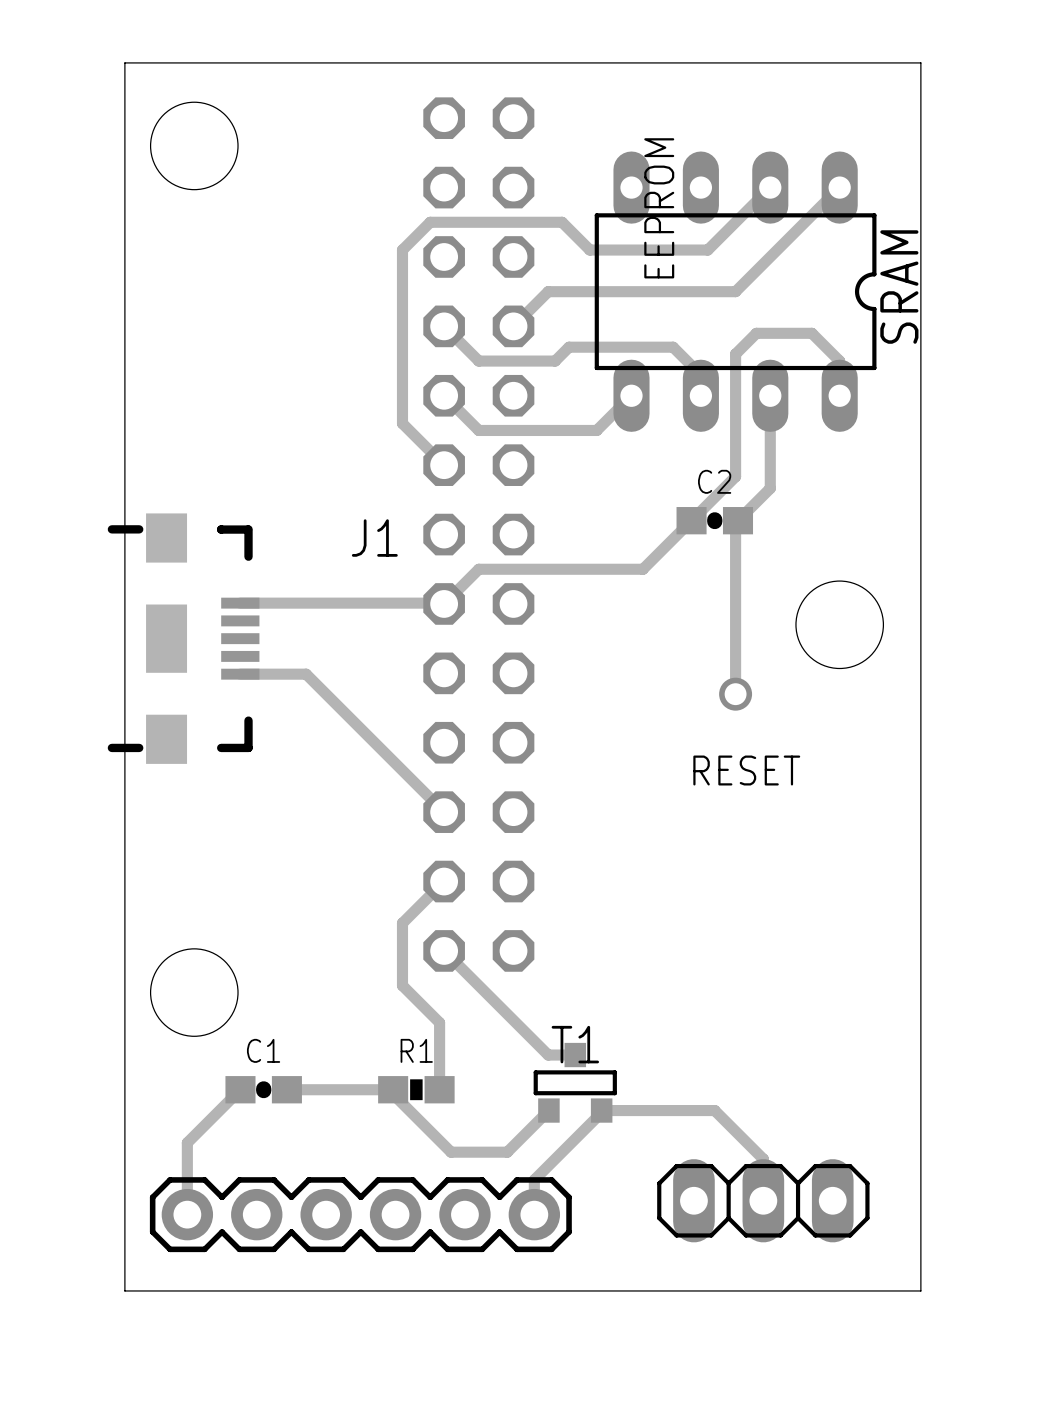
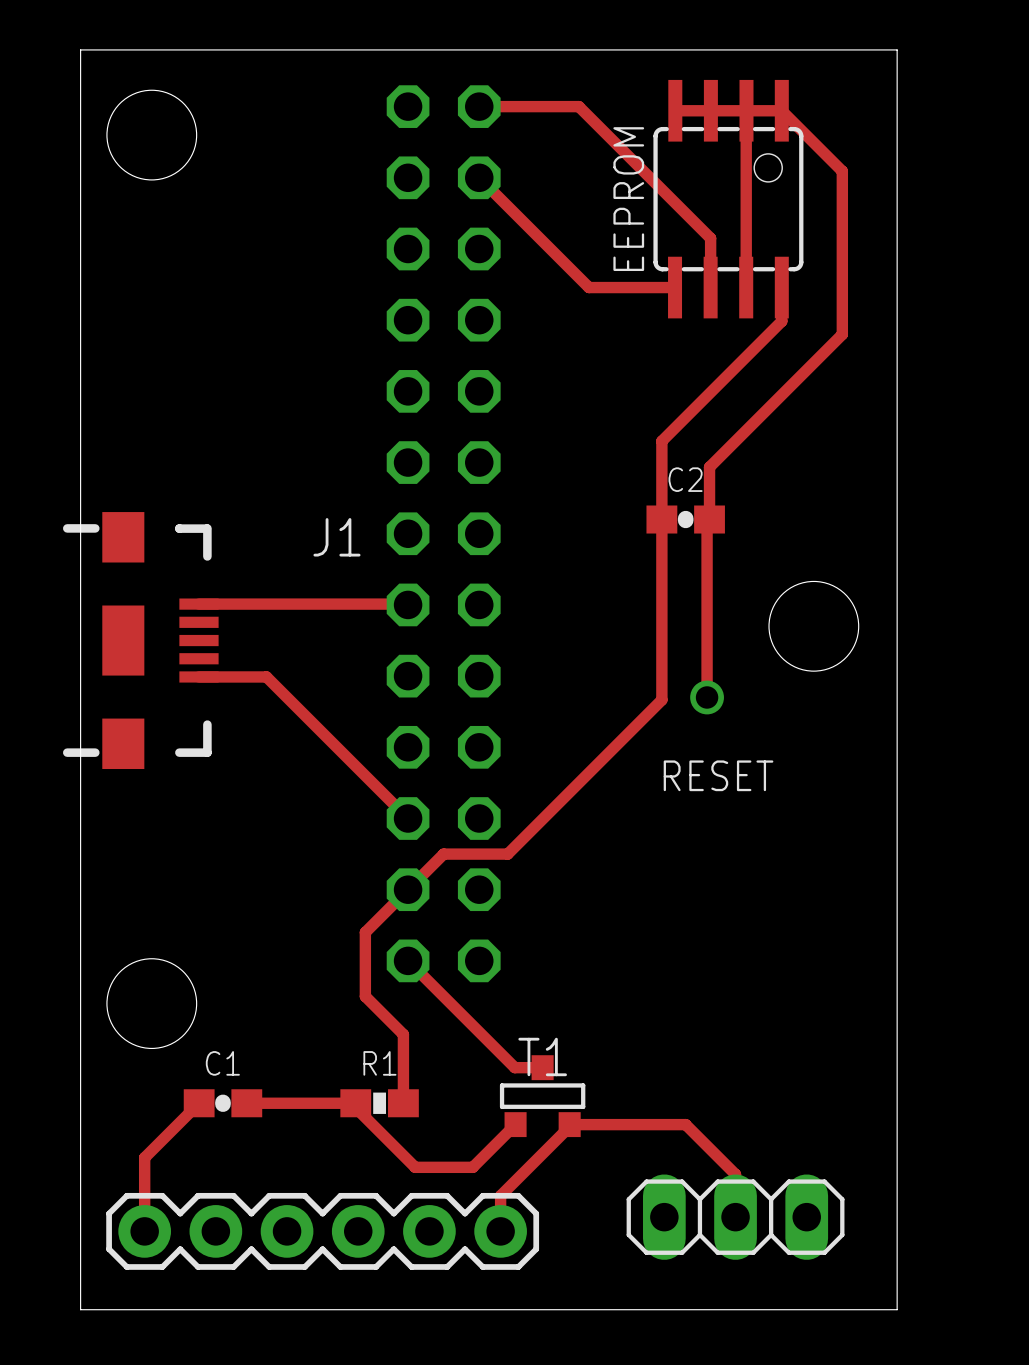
track: none -> (479, 106) (578, 106) (710, 238) (710, 287)
track: none -> (746, 110) (746, 287)
track: none -> (479, 177) (589, 287) (675, 287)
track: (770, 187) (707, 250) (589, 250) (562, 222) (430, 222) (402, 250) (402, 423) (444, 465) -> none
track: (839, 187) (735, 291) (548, 291) (513, 326) -> none
part: none -> (728, 199)
SRAM: (735, 291) -> none
track: none -> (781, 287) (781, 321) (661, 441) (661, 699) (507, 854) (443, 854) (408, 889)
track: (444, 326) (478, 361) (555, 361) (569, 347) (673, 347) (700, 374) (700, 395) -> none
track: (444, 395) (478, 430) (596, 430) (631, 395) -> none
track: (770, 395) (770, 488) (737, 520) -> (675, 110) (781, 110) (842, 171) (842, 334) (709, 467) (709, 519)
track: (839, 395) (839, 361) (811, 333) (756, 333) (735, 354) (735, 476) (642, 569) (478, 569) (444, 603) -> none

